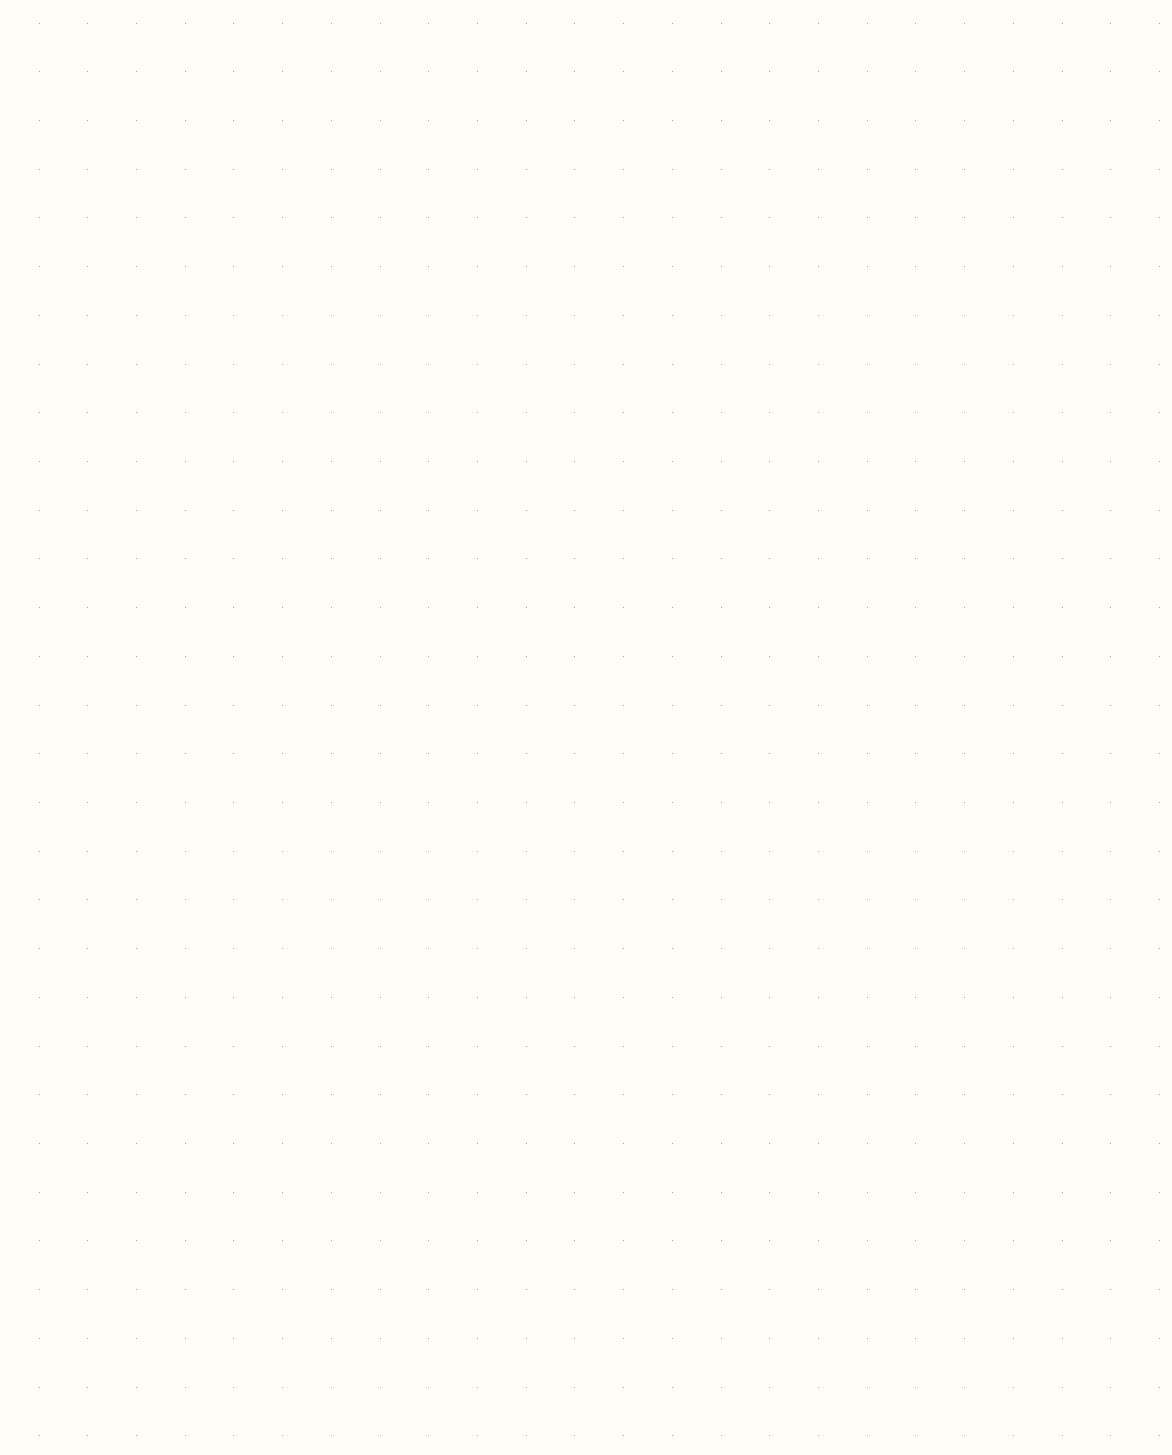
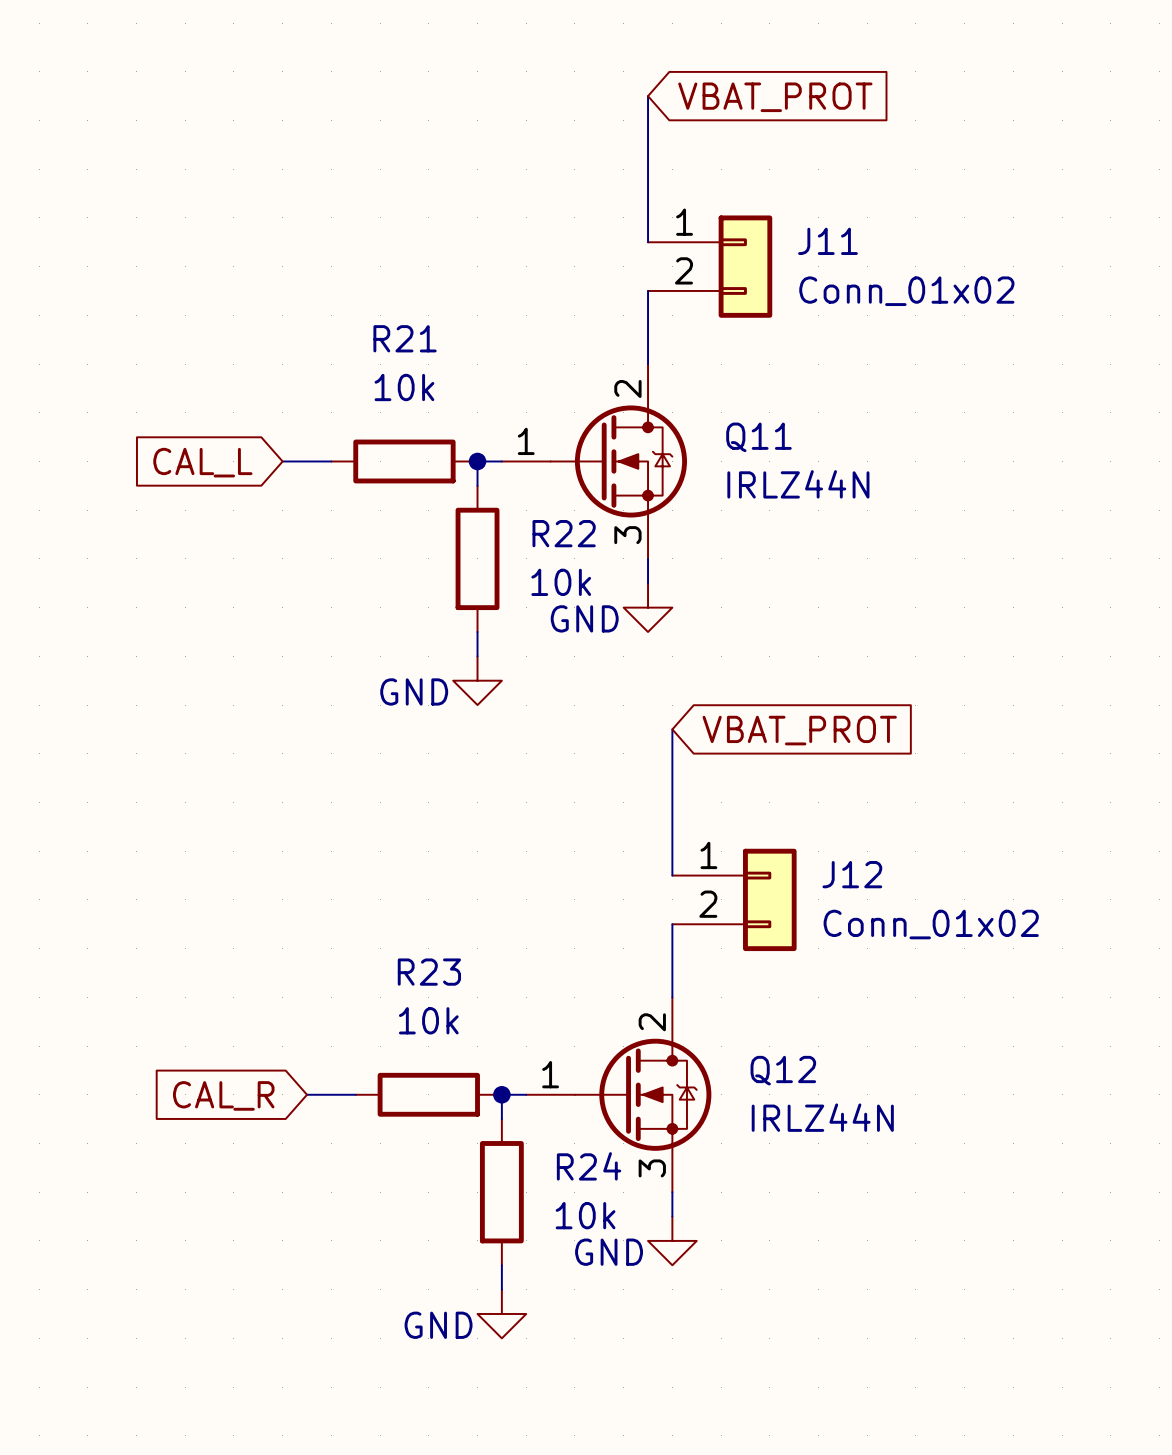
wire: none -> (648, 96) (648, 242)
global label: none -> VBAT_PROT (775, 97)
J11: none -> Conn_01x02 (710, 266)
wire: none -> (648, 290) (648, 364)
wire: none -> (282, 461) (331, 461)
R21: none -> 10k (404, 461)
junction: none -> (477, 461)
wire: none -> (501, 461) (477, 461) (477, 485)
Q11: none -> IRLZ44N (594, 461)
global label: none -> CAL_L (202, 462)
R22: none -> 10k (477, 558)
wire: none -> (648, 558) (648, 583)
power symbol: none -> GND (648, 607)
wire: none -> (477, 631) (477, 656)
power symbol: none -> GND (477, 680)
wire: none -> (672, 729) (672, 875)
global label: none -> VBAT_PROT (799, 730)
J12: none -> Conn_01x02 (734, 899)
wire: none -> (672, 924) (672, 997)
wire: none -> (307, 1094) (355, 1094)
R23: none -> 10k (428, 1094)
junction: none -> (501, 1094)
wire: none -> (526, 1094) (501, 1094) (501, 1119)
Q12: none -> IRLZ44N (618, 1094)
global label: none -> CAL_R (223, 1095)
R24: none -> 10k (501, 1192)
wire: none -> (672, 1192) (672, 1216)
power symbol: none -> GND (672, 1240)
wire: none -> (501, 1265) (501, 1289)
power symbol: none -> GND (501, 1313)

